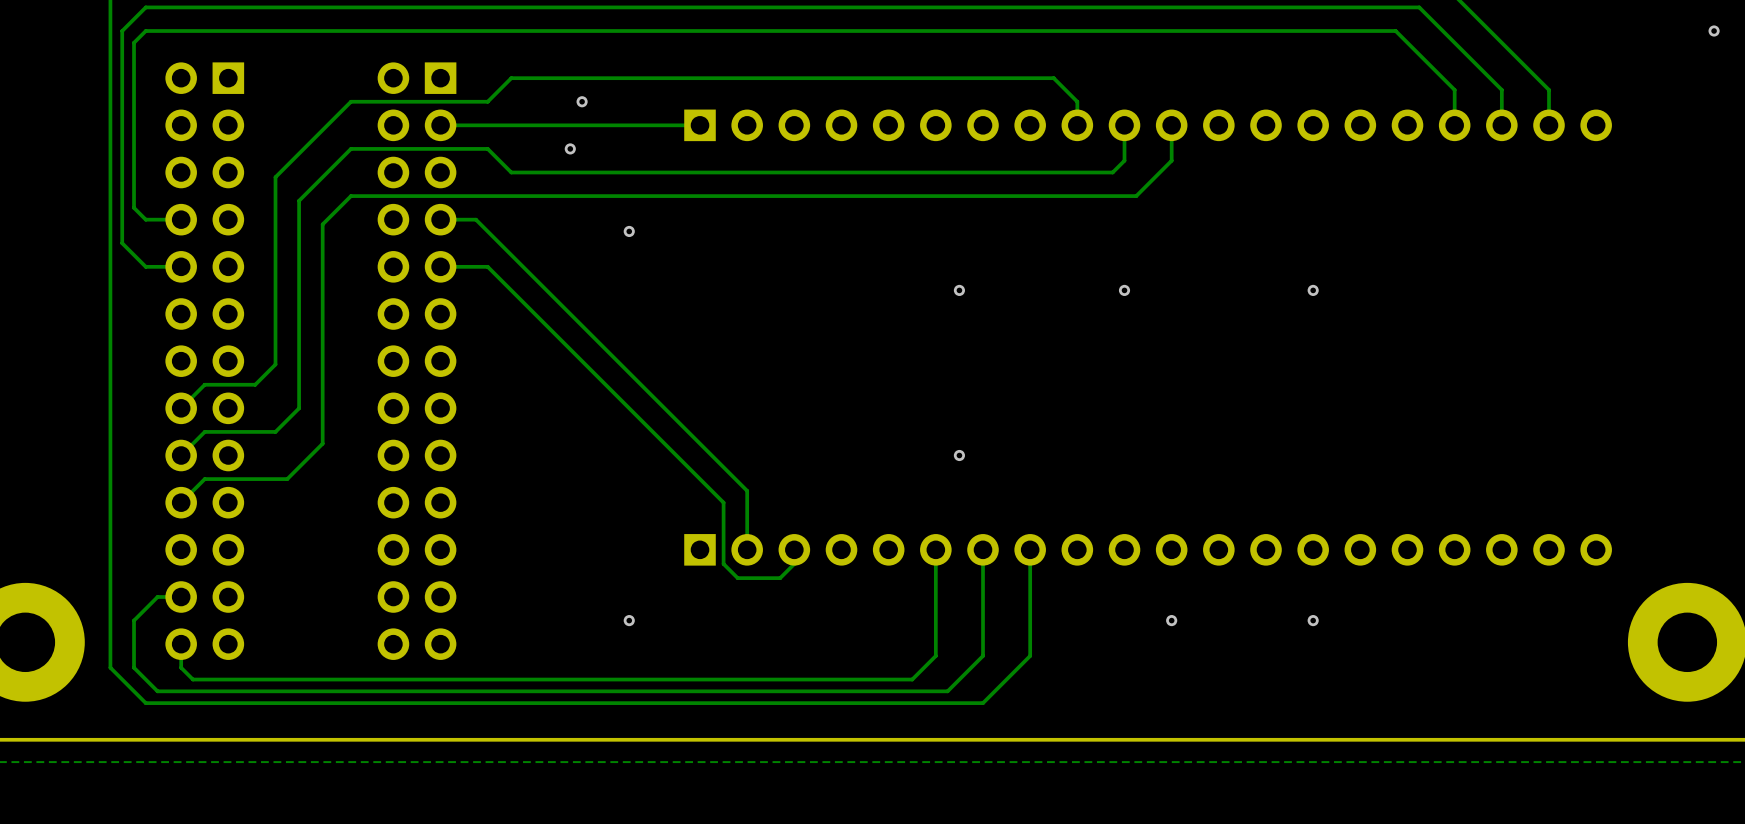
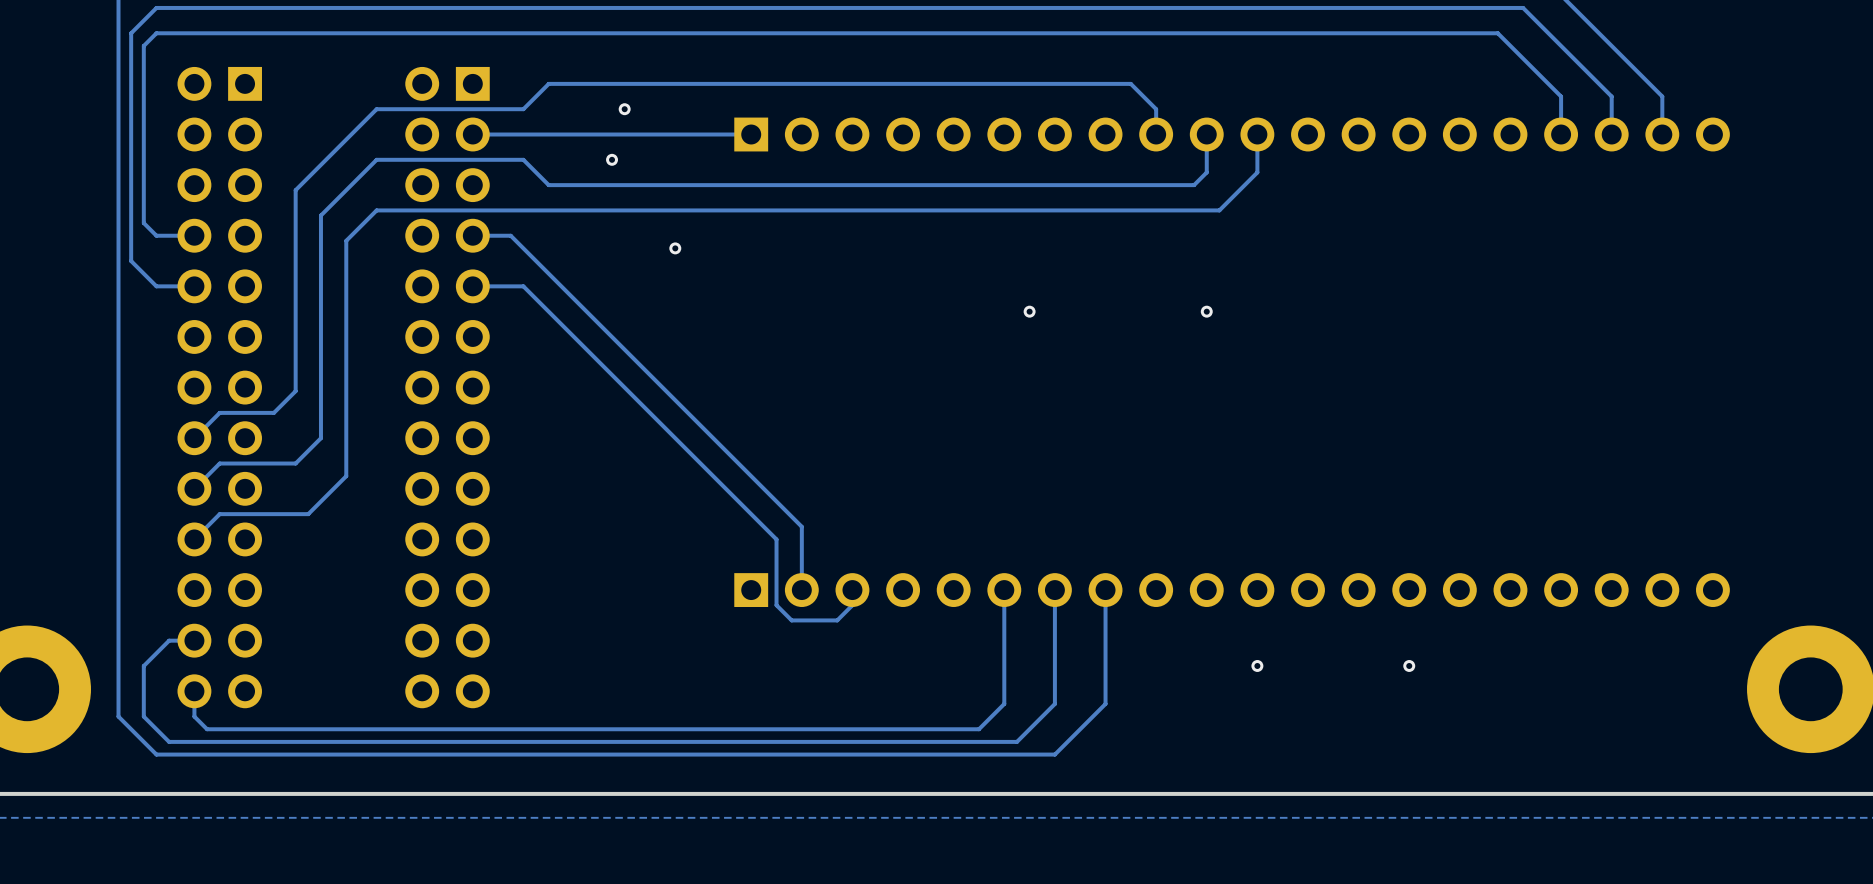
via: (1714, 31) -> none
via: (1313, 290) -> none
via: (959, 455) -> none
via: (629, 620) -> none

